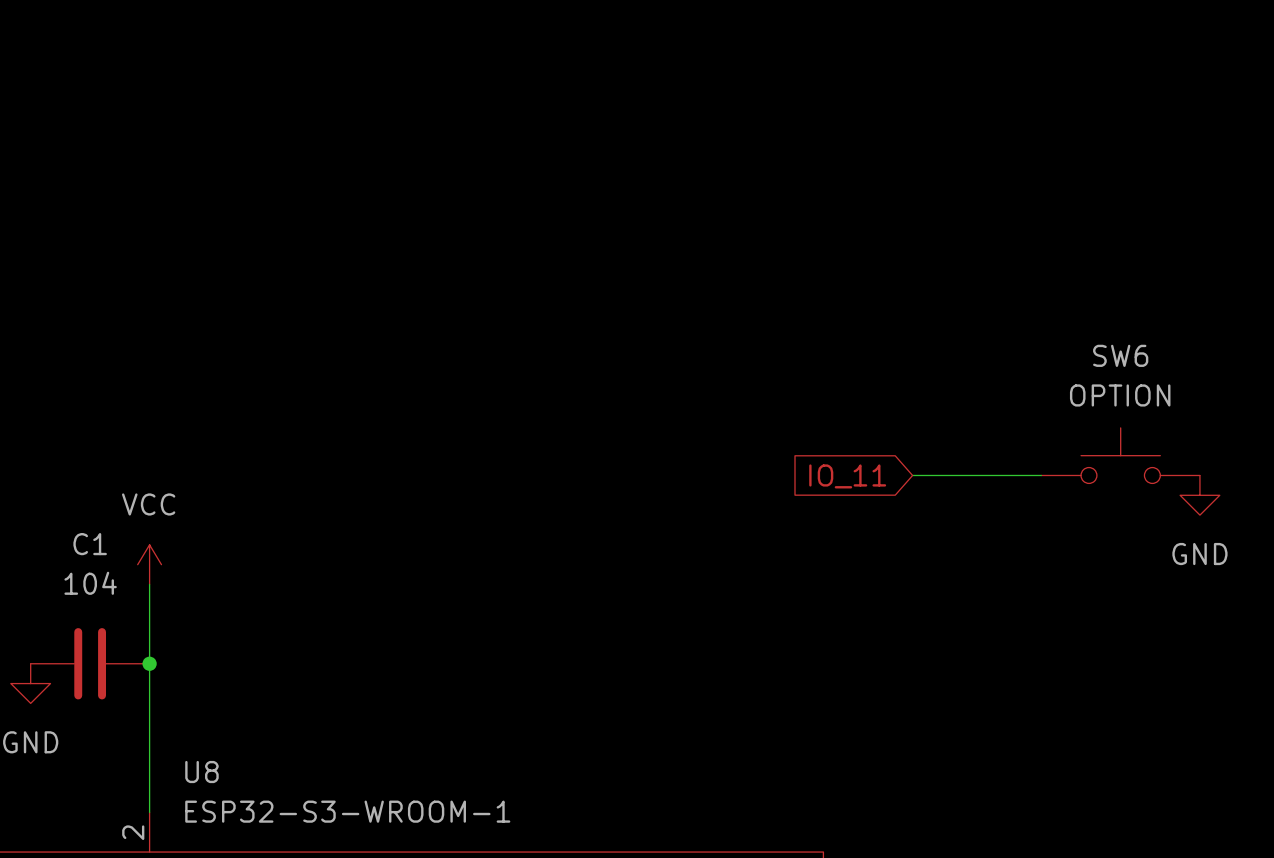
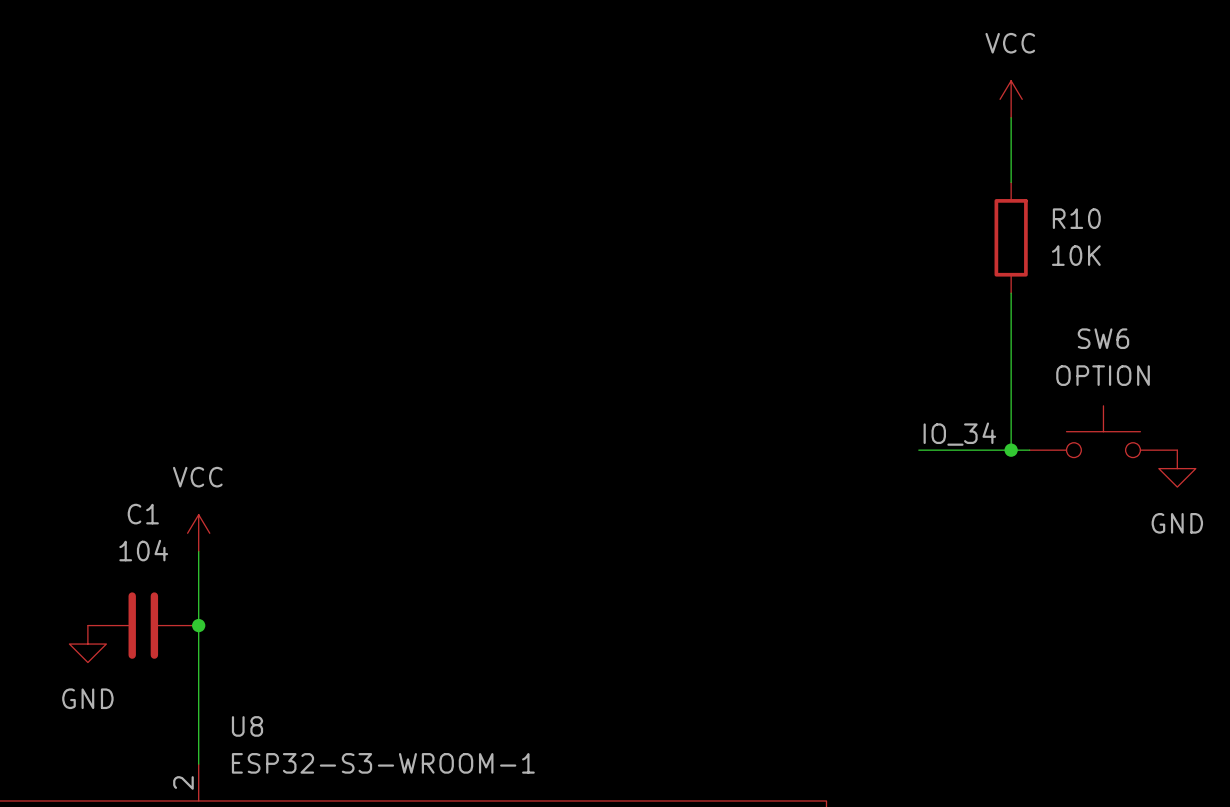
power symbol: none -> VCC (1011, 99)
wire: none -> (1011, 117) (1011, 182)
R10: none -> 10K (1011, 237)
wire: none -> (1011, 293) (1011, 450)
label: none -> IO_34 (959, 434)
wire: (912, 475) (922, 475) -> none
junction: none -> (1011, 450)
global label: IO_11 (847, 476) -> none

